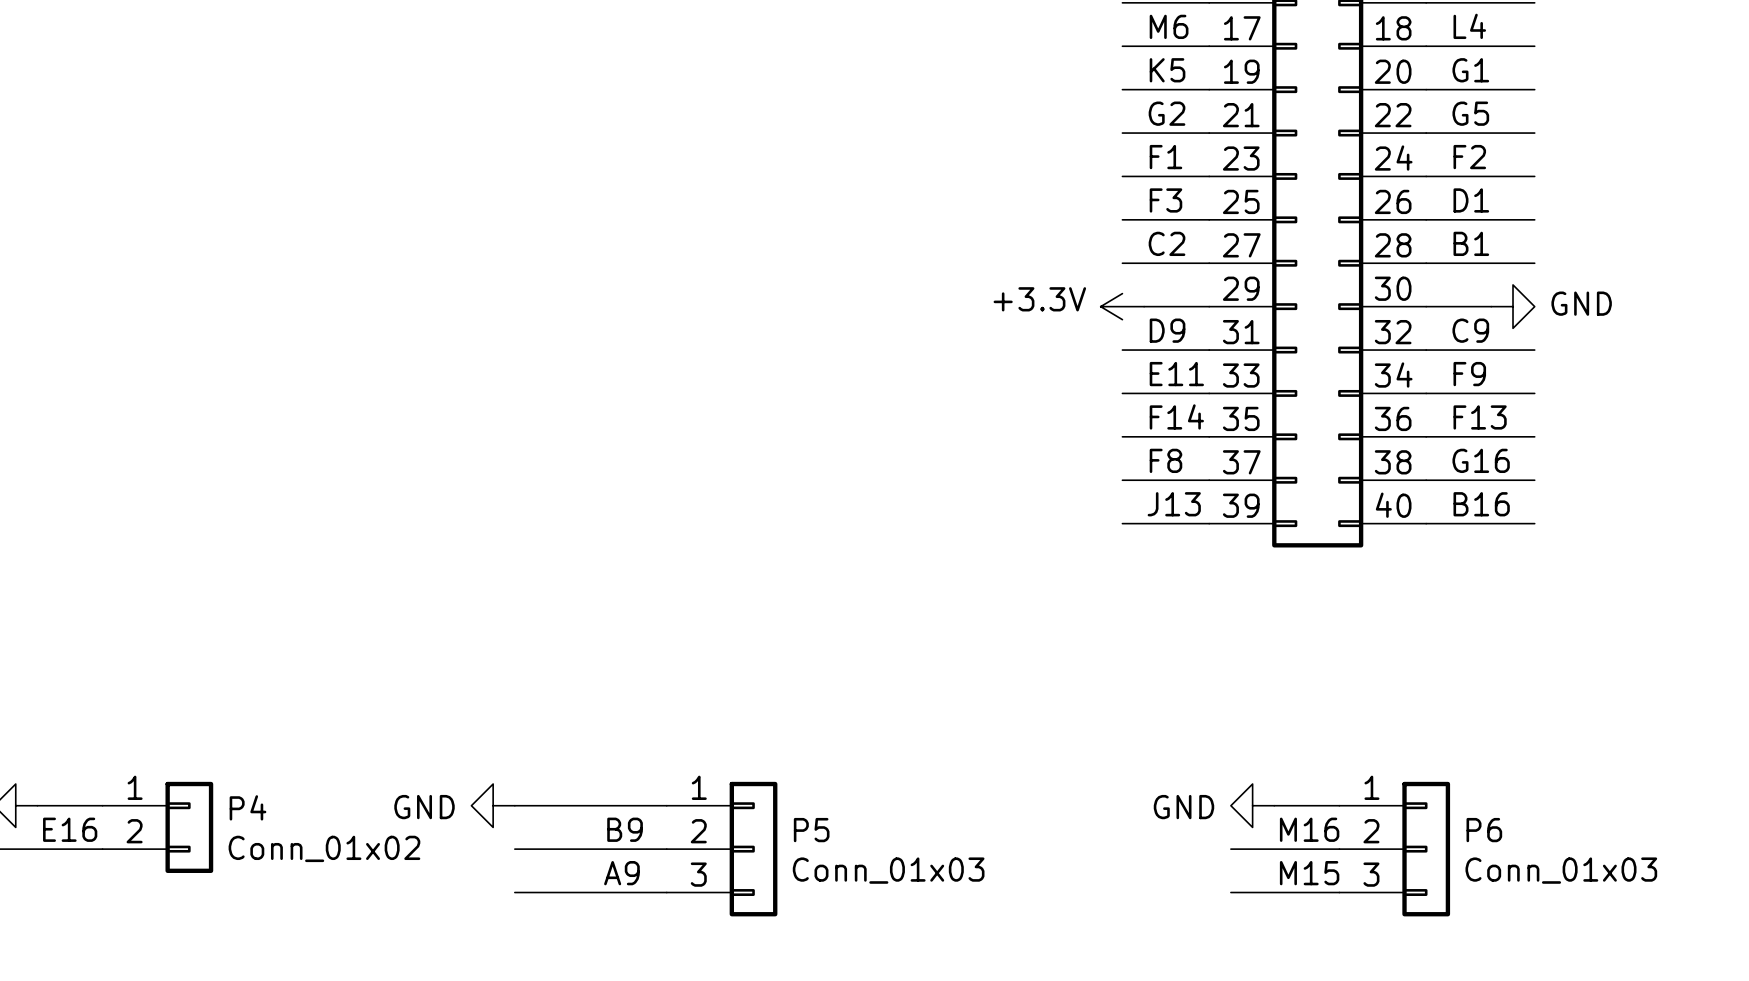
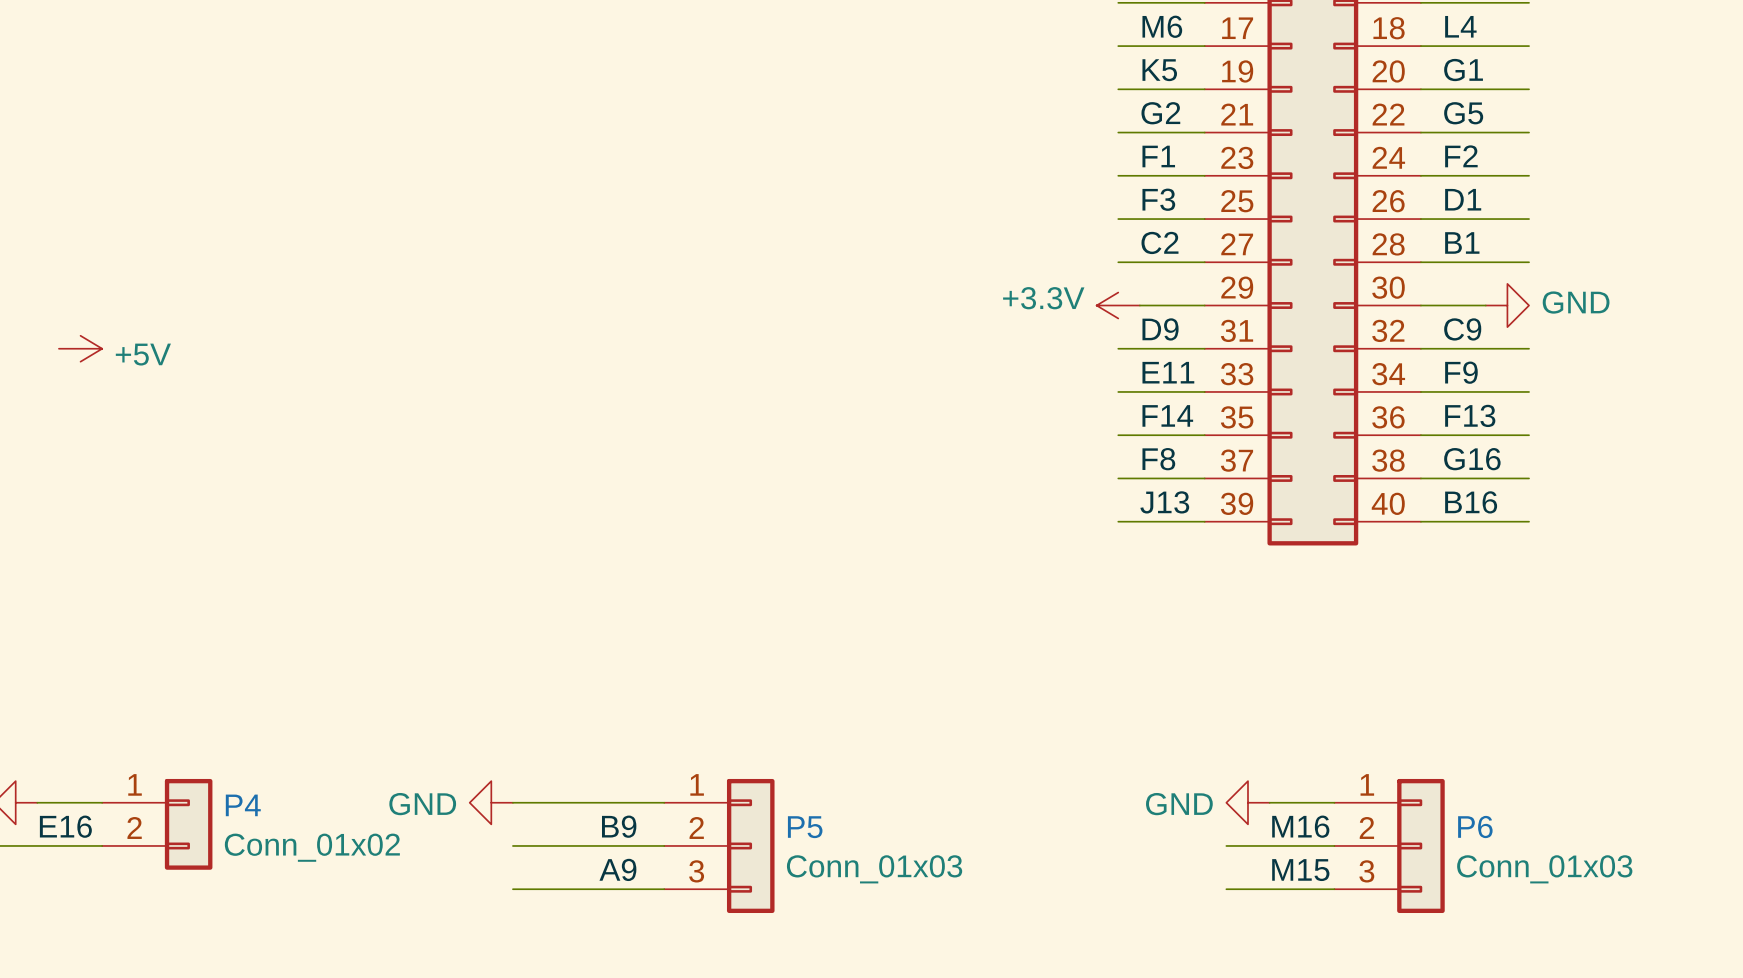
power symbol: none -> +5V (80, 348)

